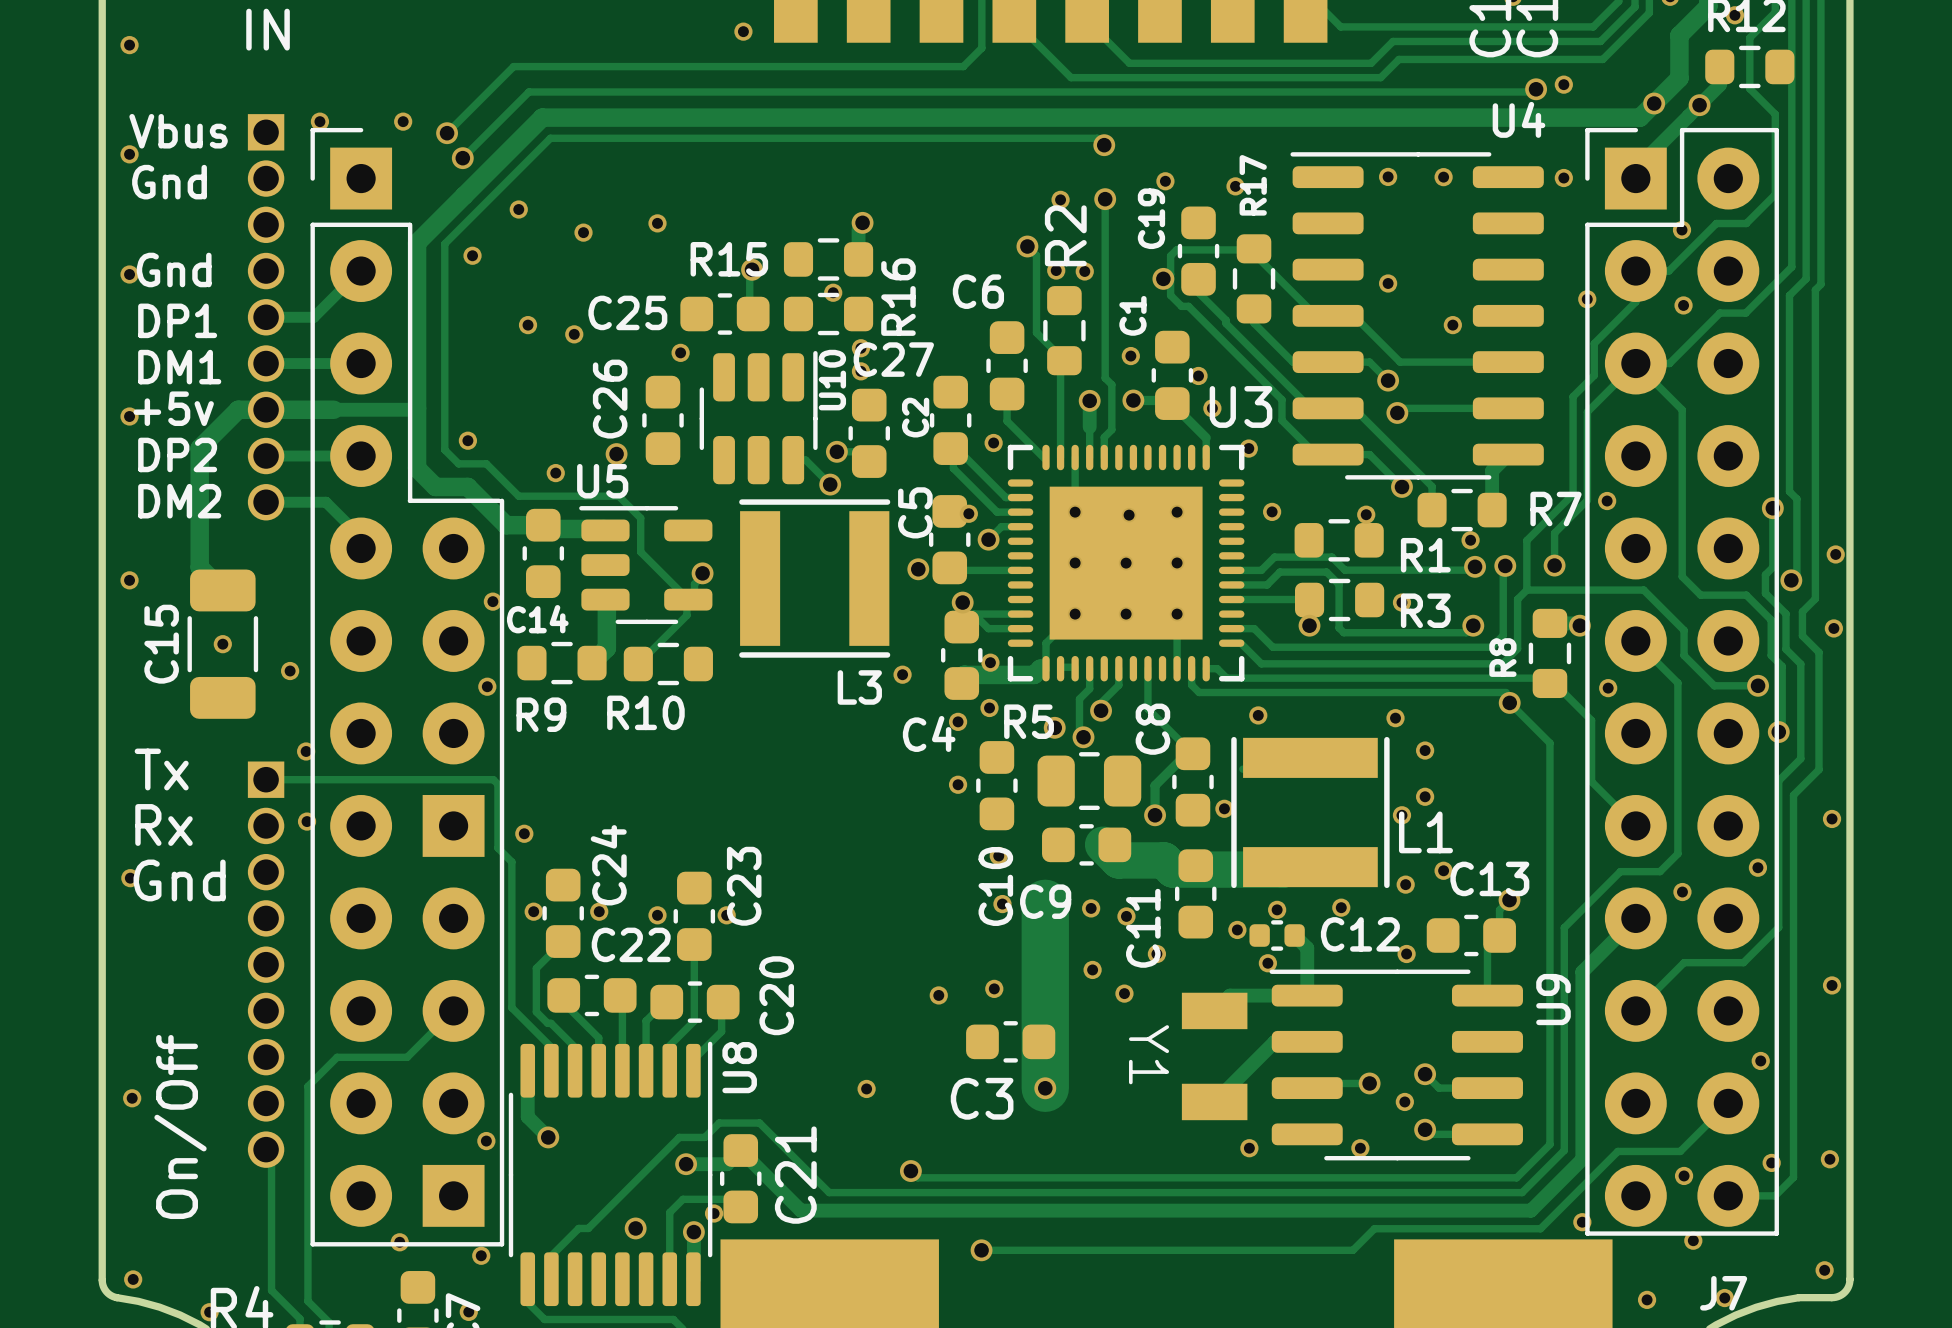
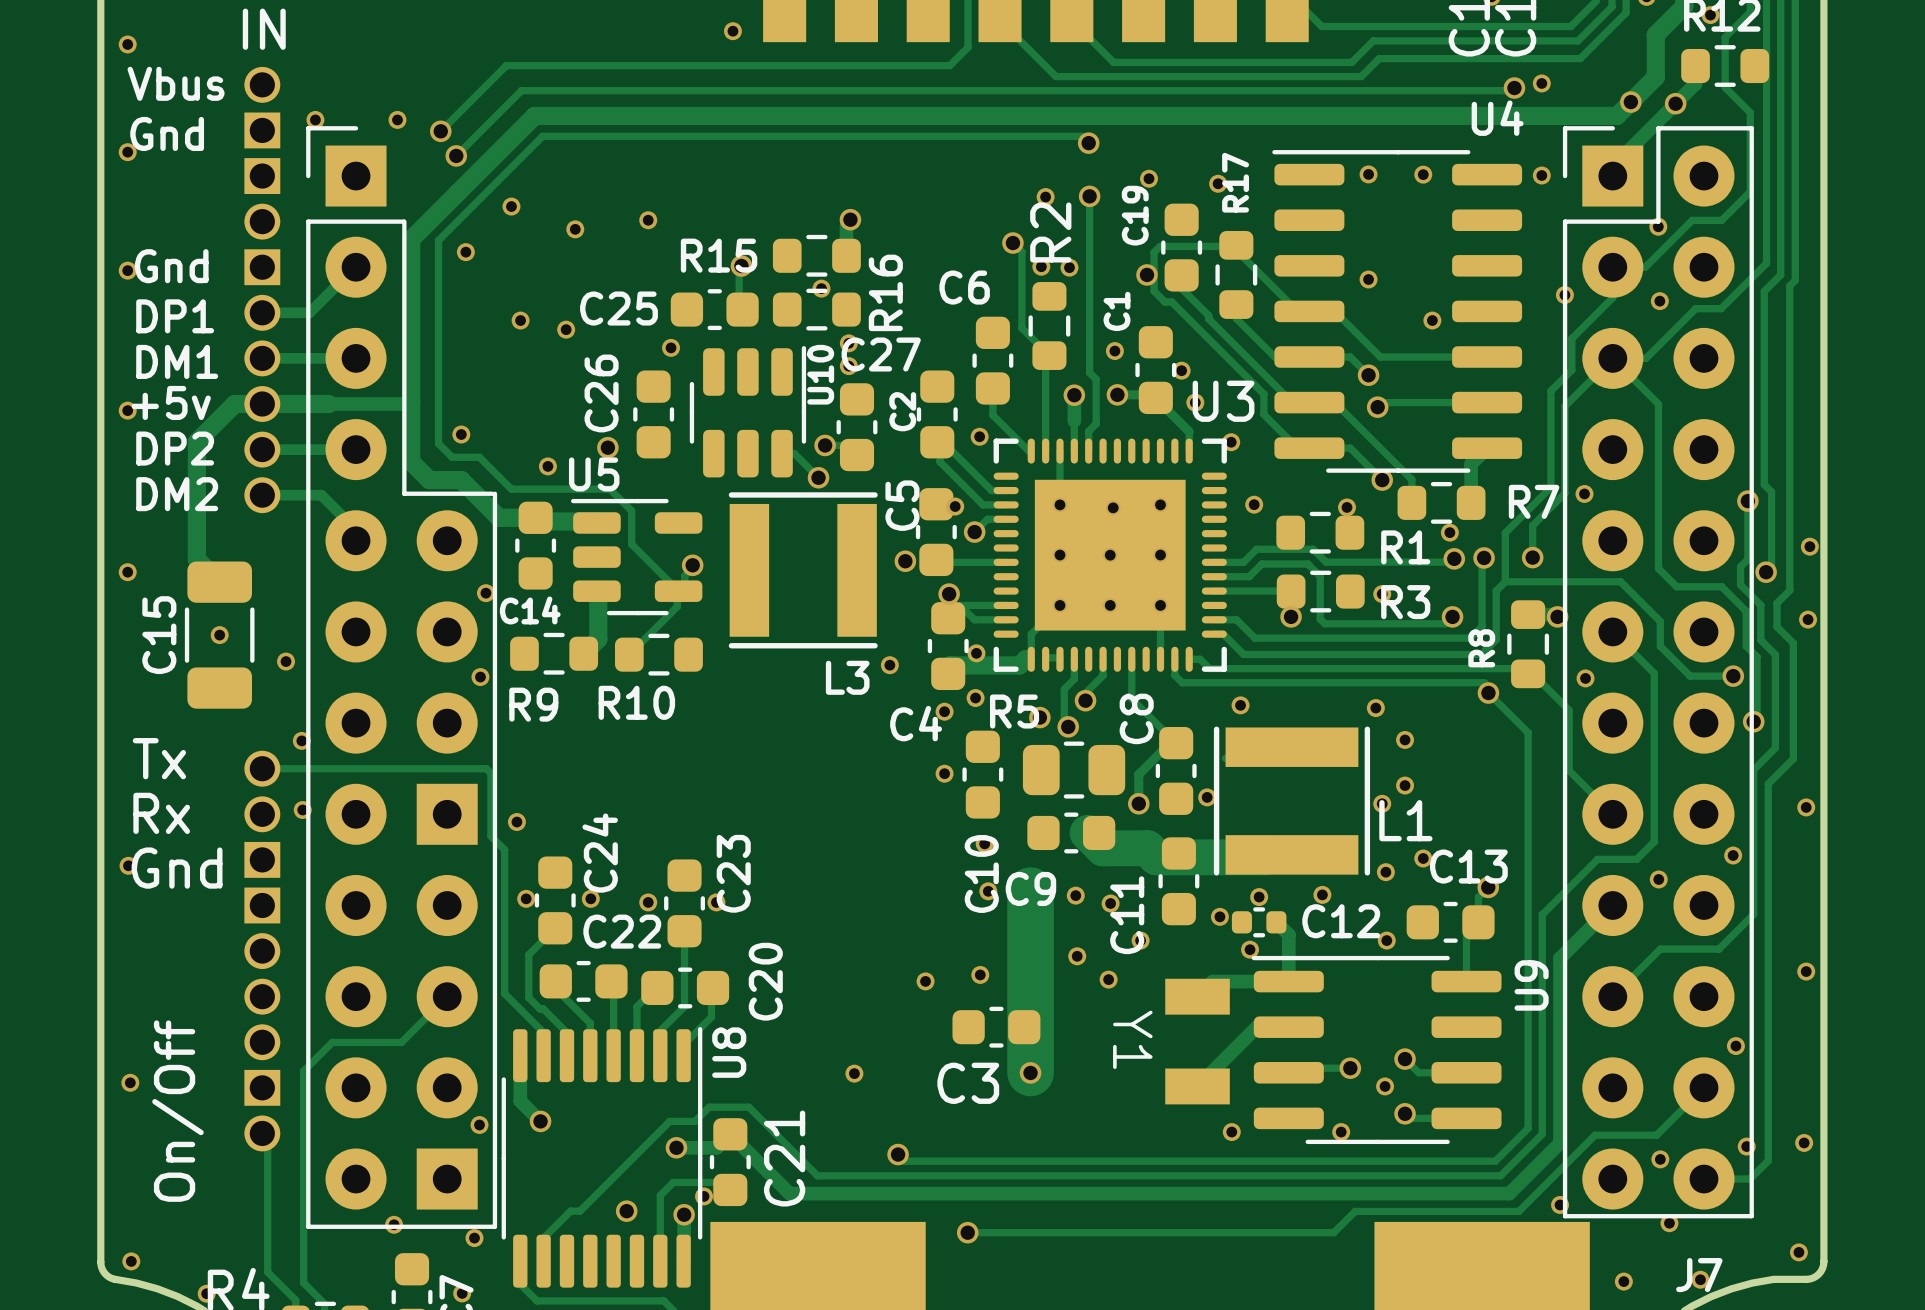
text: none -> Vbus (176, 83)
part: none -> (262, 107)
text: Vbus (178, 131) -> Gnd (167, 133)
text: Gnd (169, 182) -> none
part: none -> (262, 198)
part: (266, 317) -> none
part: none -> (262, 381)
part footprint: [247, 761, 285, 1168] -> [244, 887, 281, 1061]
part: none -> (262, 814)
part: none -> (262, 1110)

